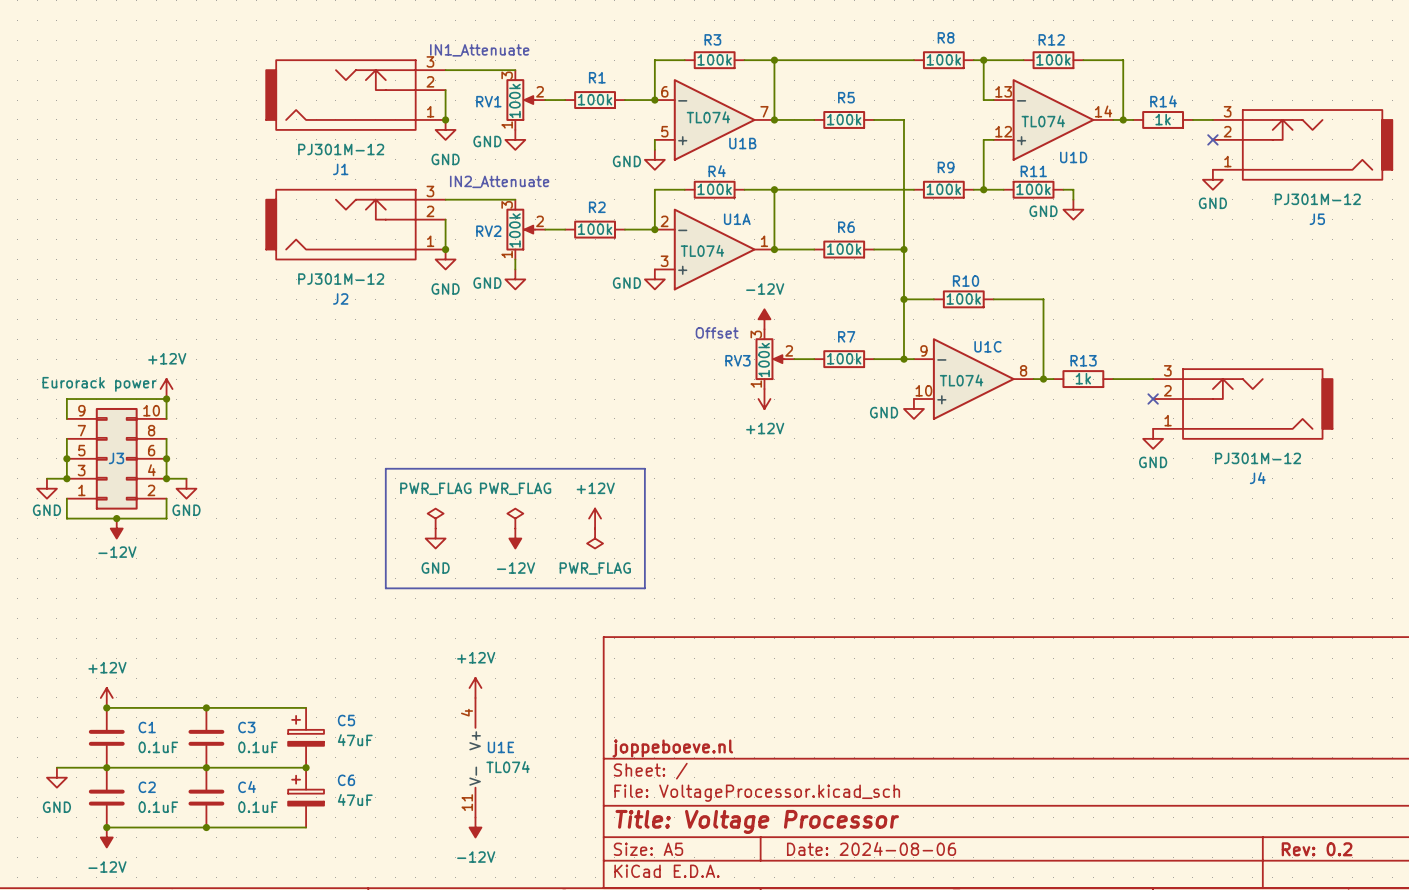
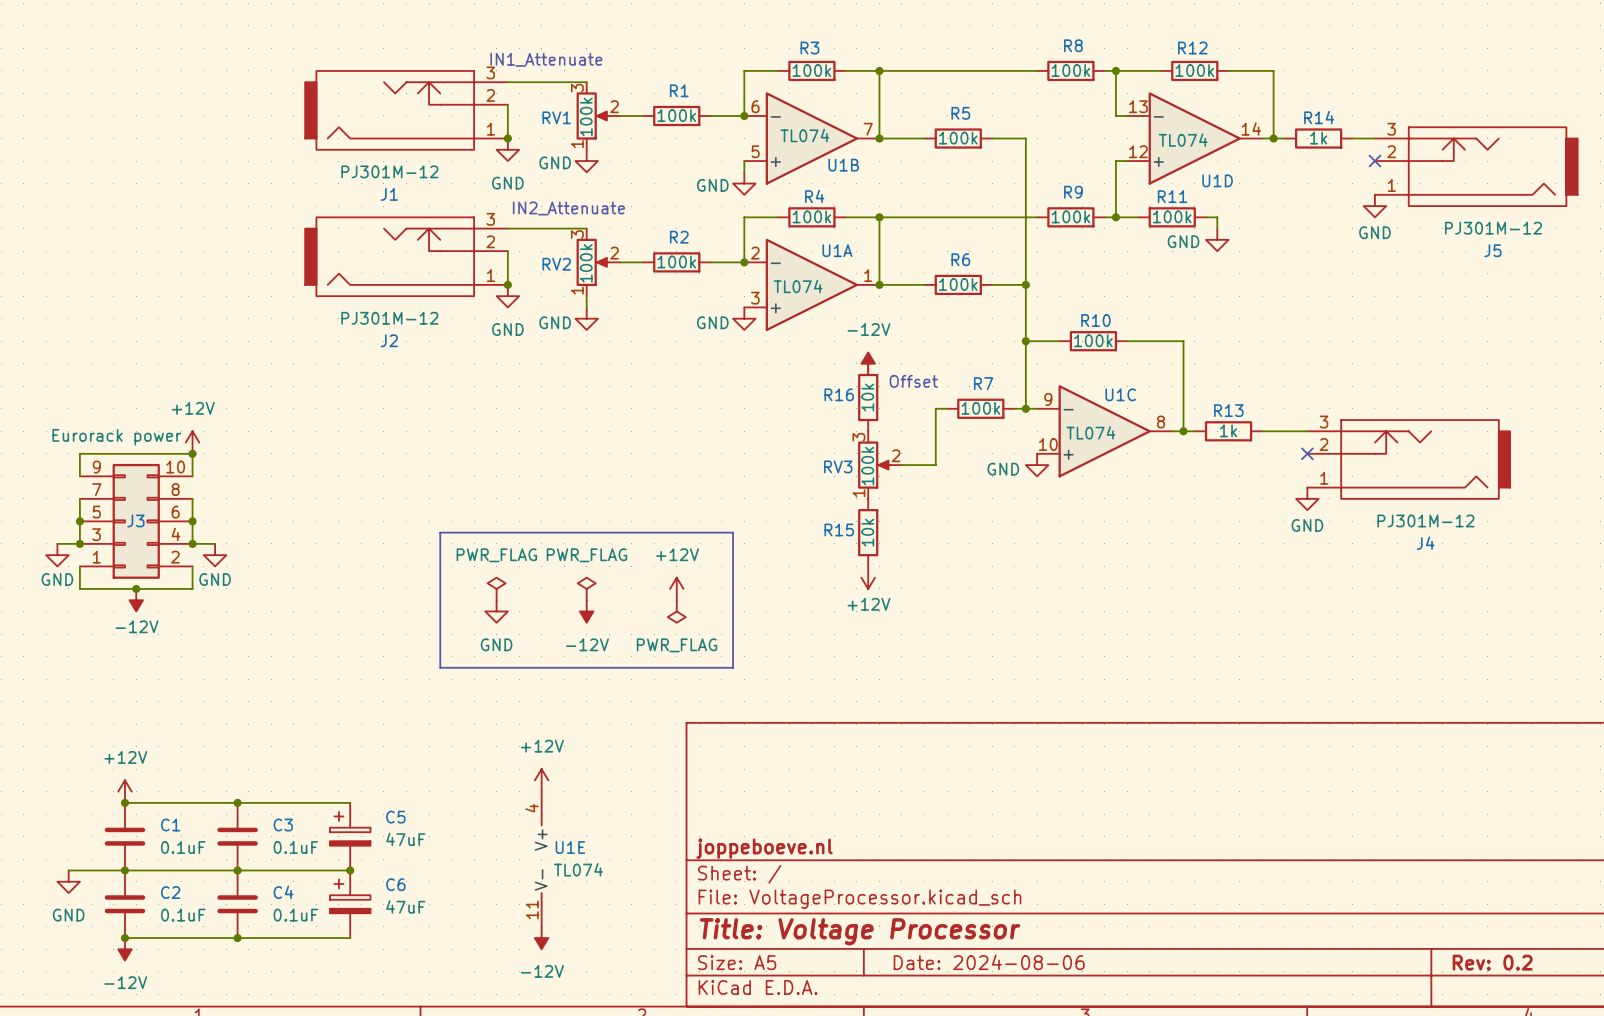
text position: Offset (717, 332) -> Offset (913, 381)
R16: none -> 10k (868, 397)
RV3 position: (774, 359) -> (880, 465)
wire: (794, 359) (814, 359) -> none
wire: none -> (947, 408) (935, 408) (935, 465) (901, 465)
R7 position: (844, 359) -> (980, 408)
power symbol position: +12V (764, 399) -> +12V (868, 577)
power symbol text position: +12V (765, 428) -> +12V (869, 604)
R15: none -> 10k (868, 532)

